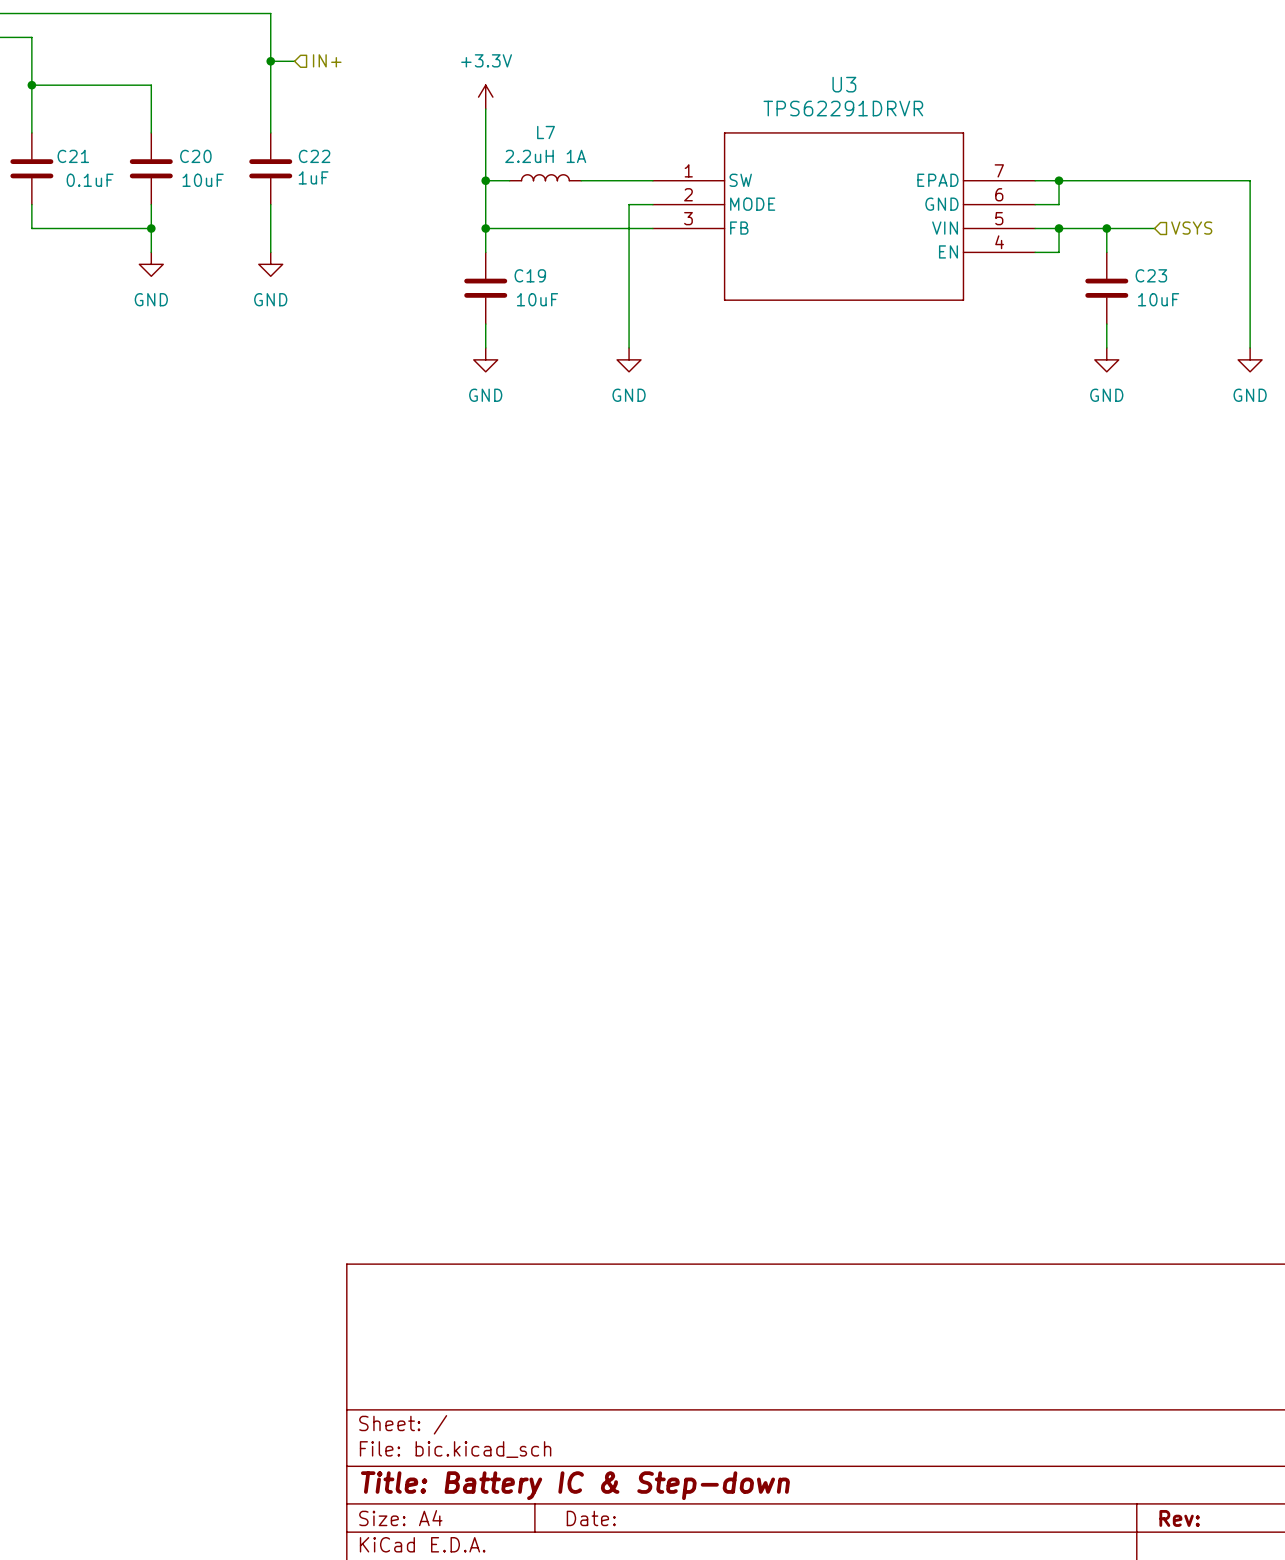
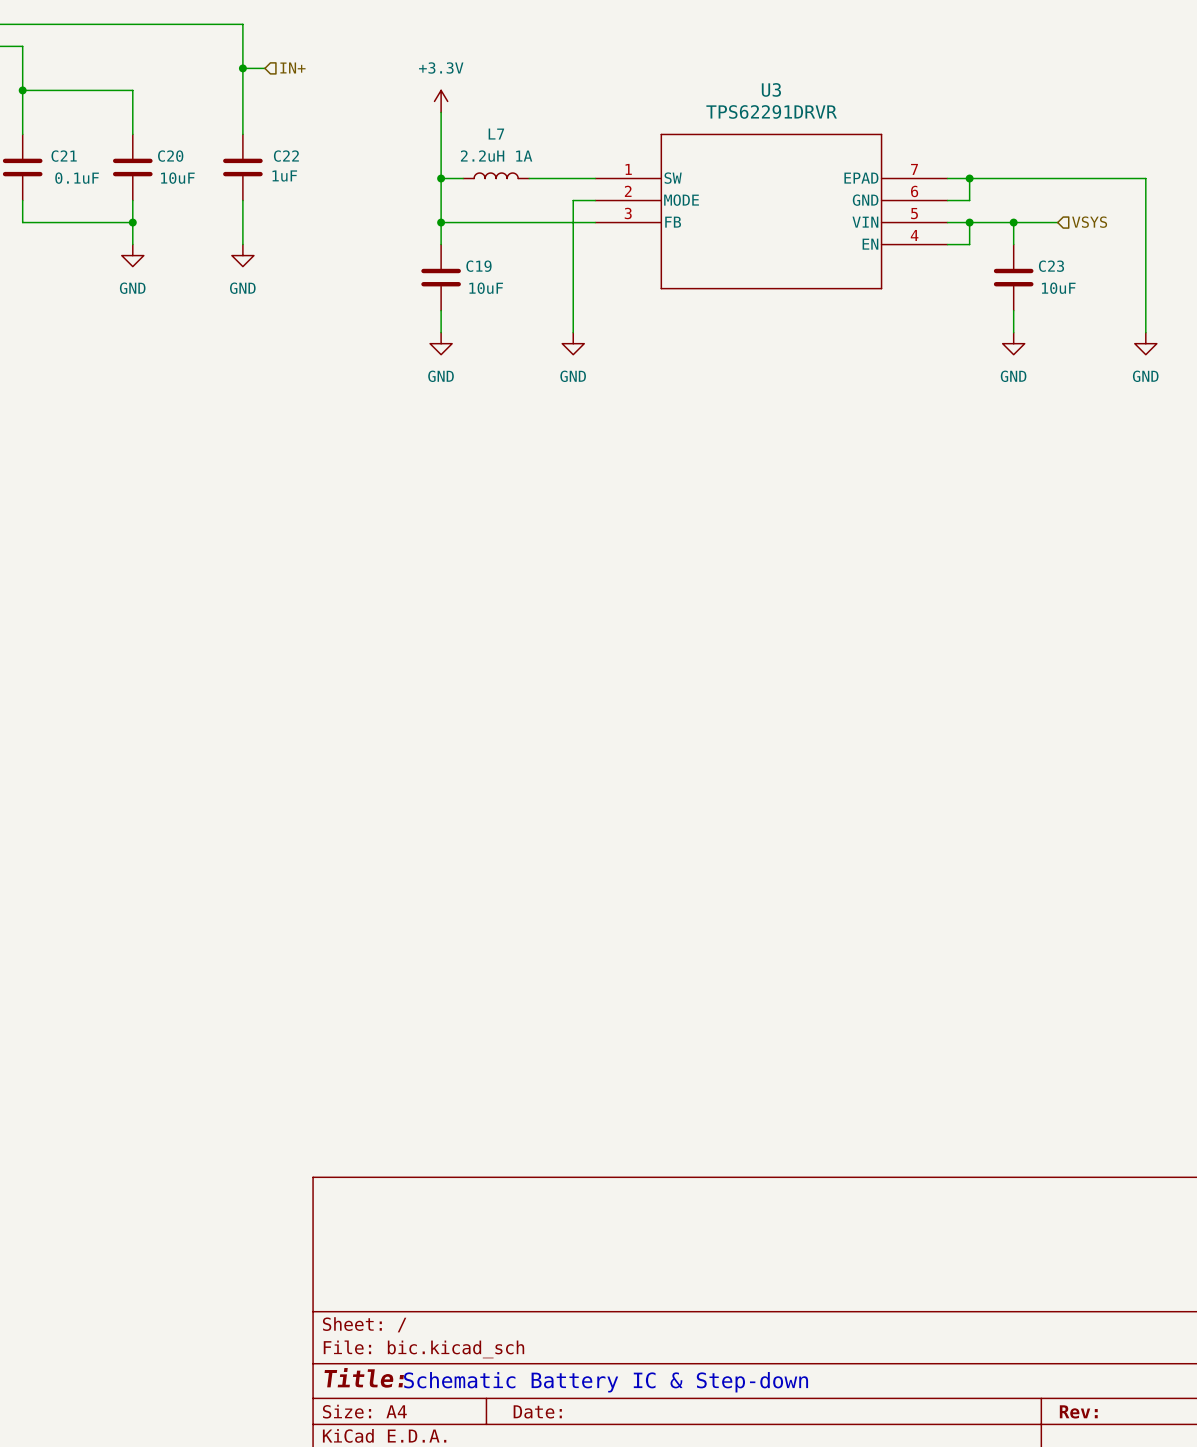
title block: Title: Battery IC & Step-down (575, 1485) -> Title: (364, 1377)
text: none -> Schematic Battery IC & Step-down (606, 1382)

